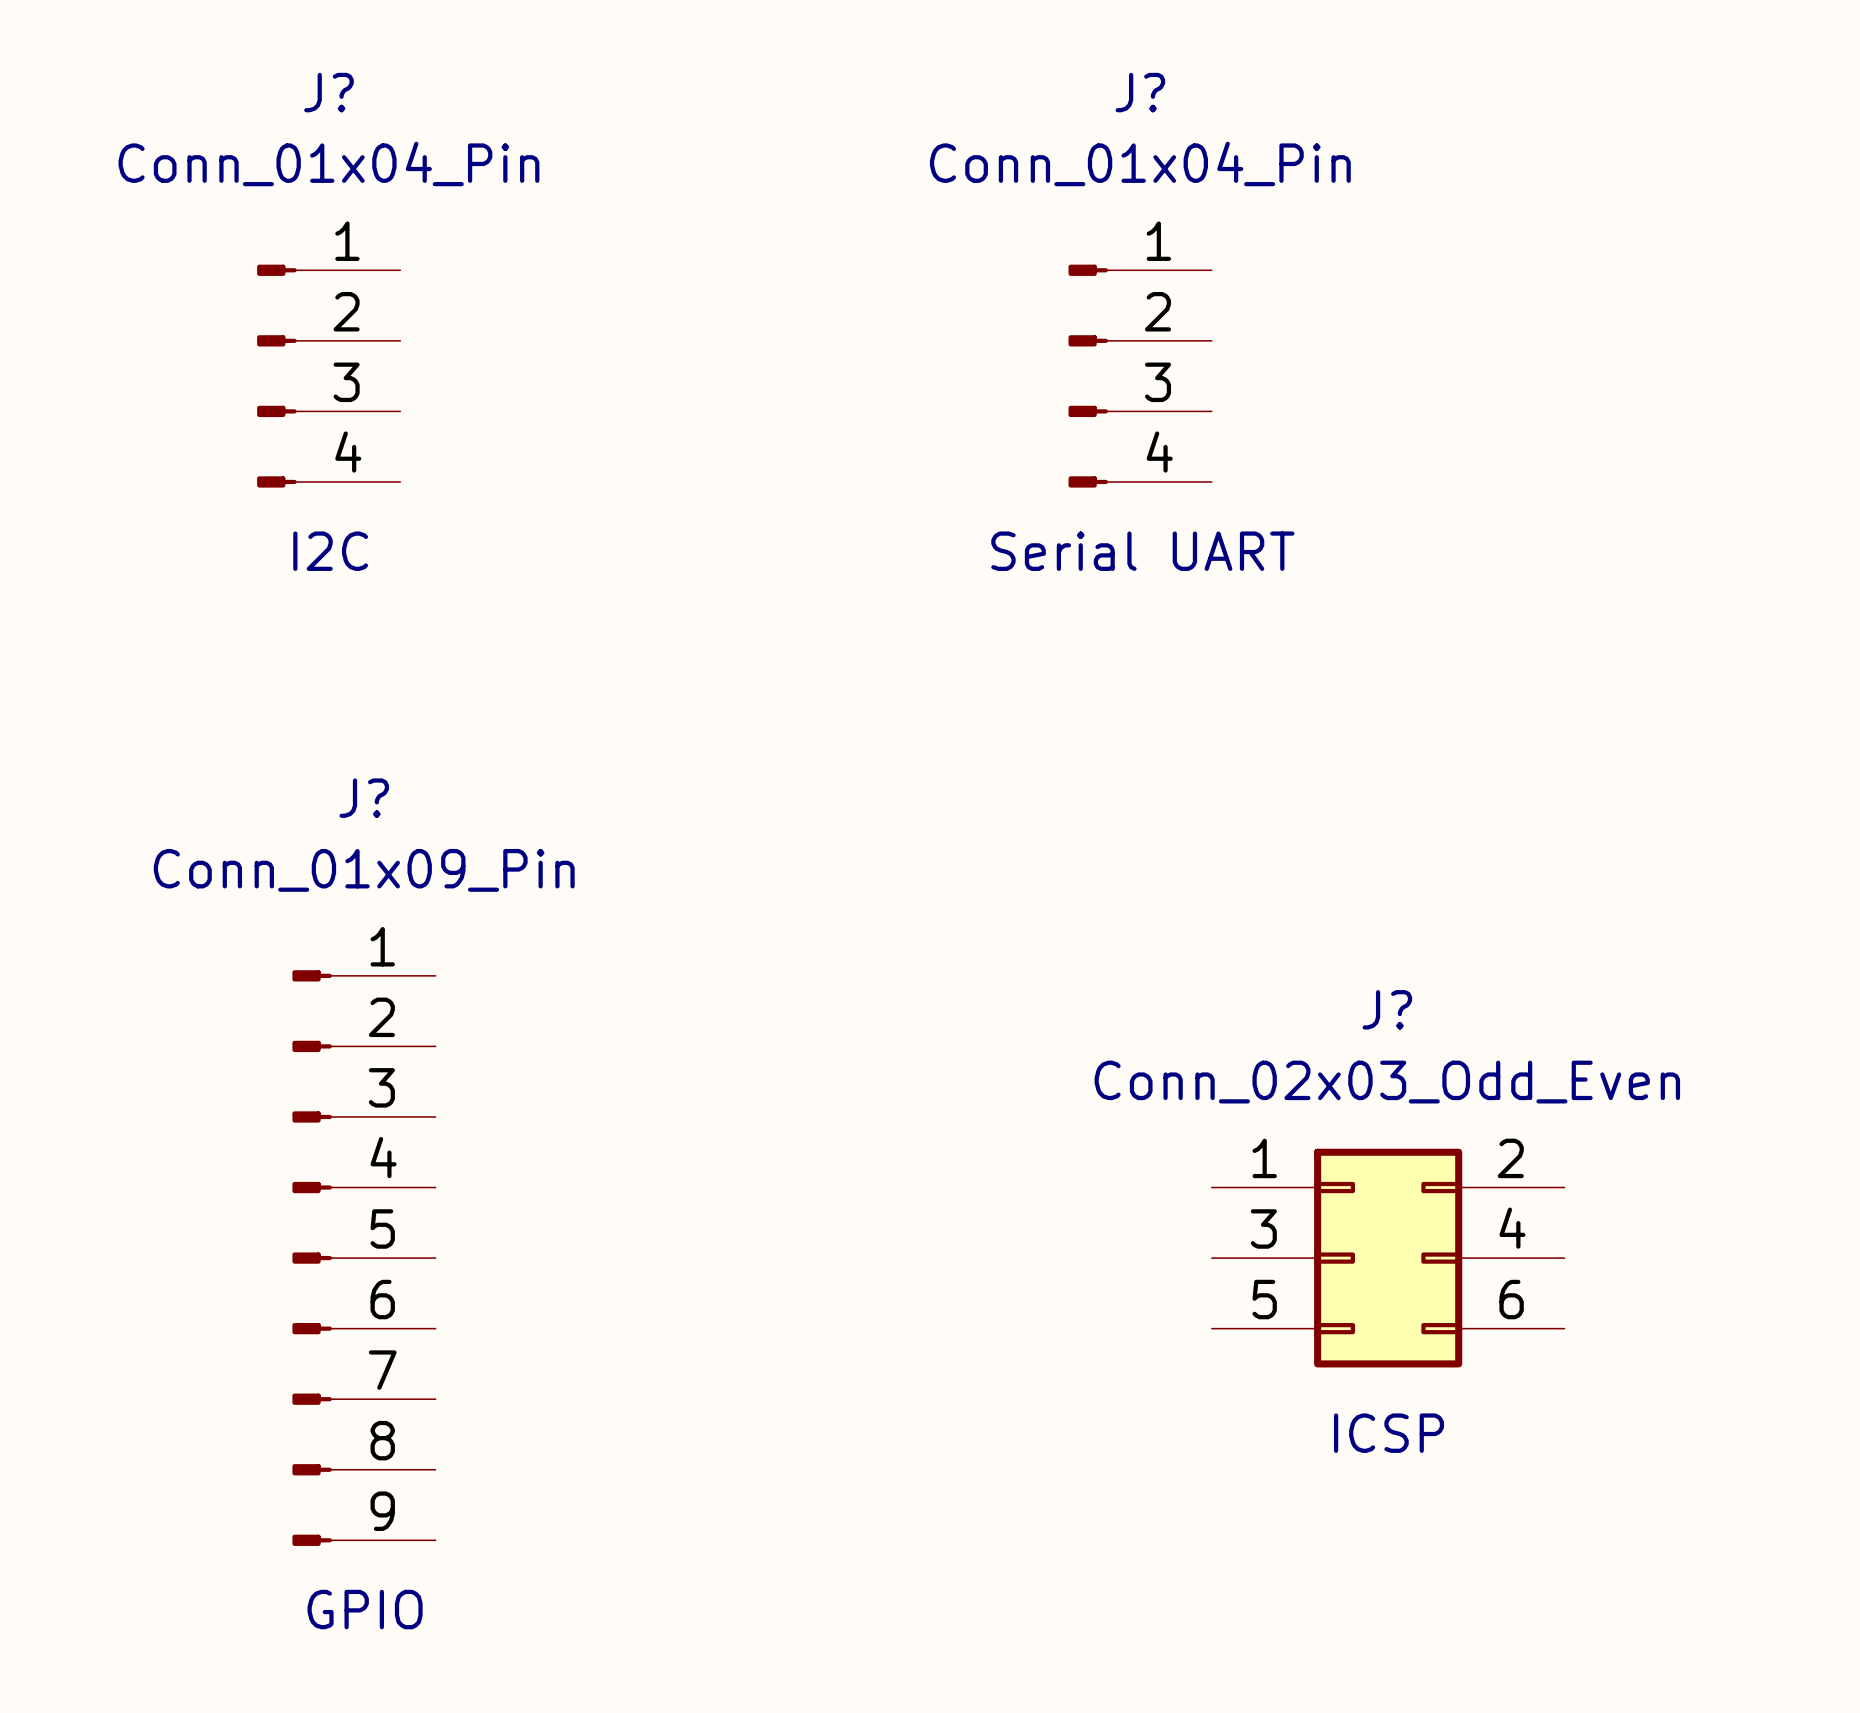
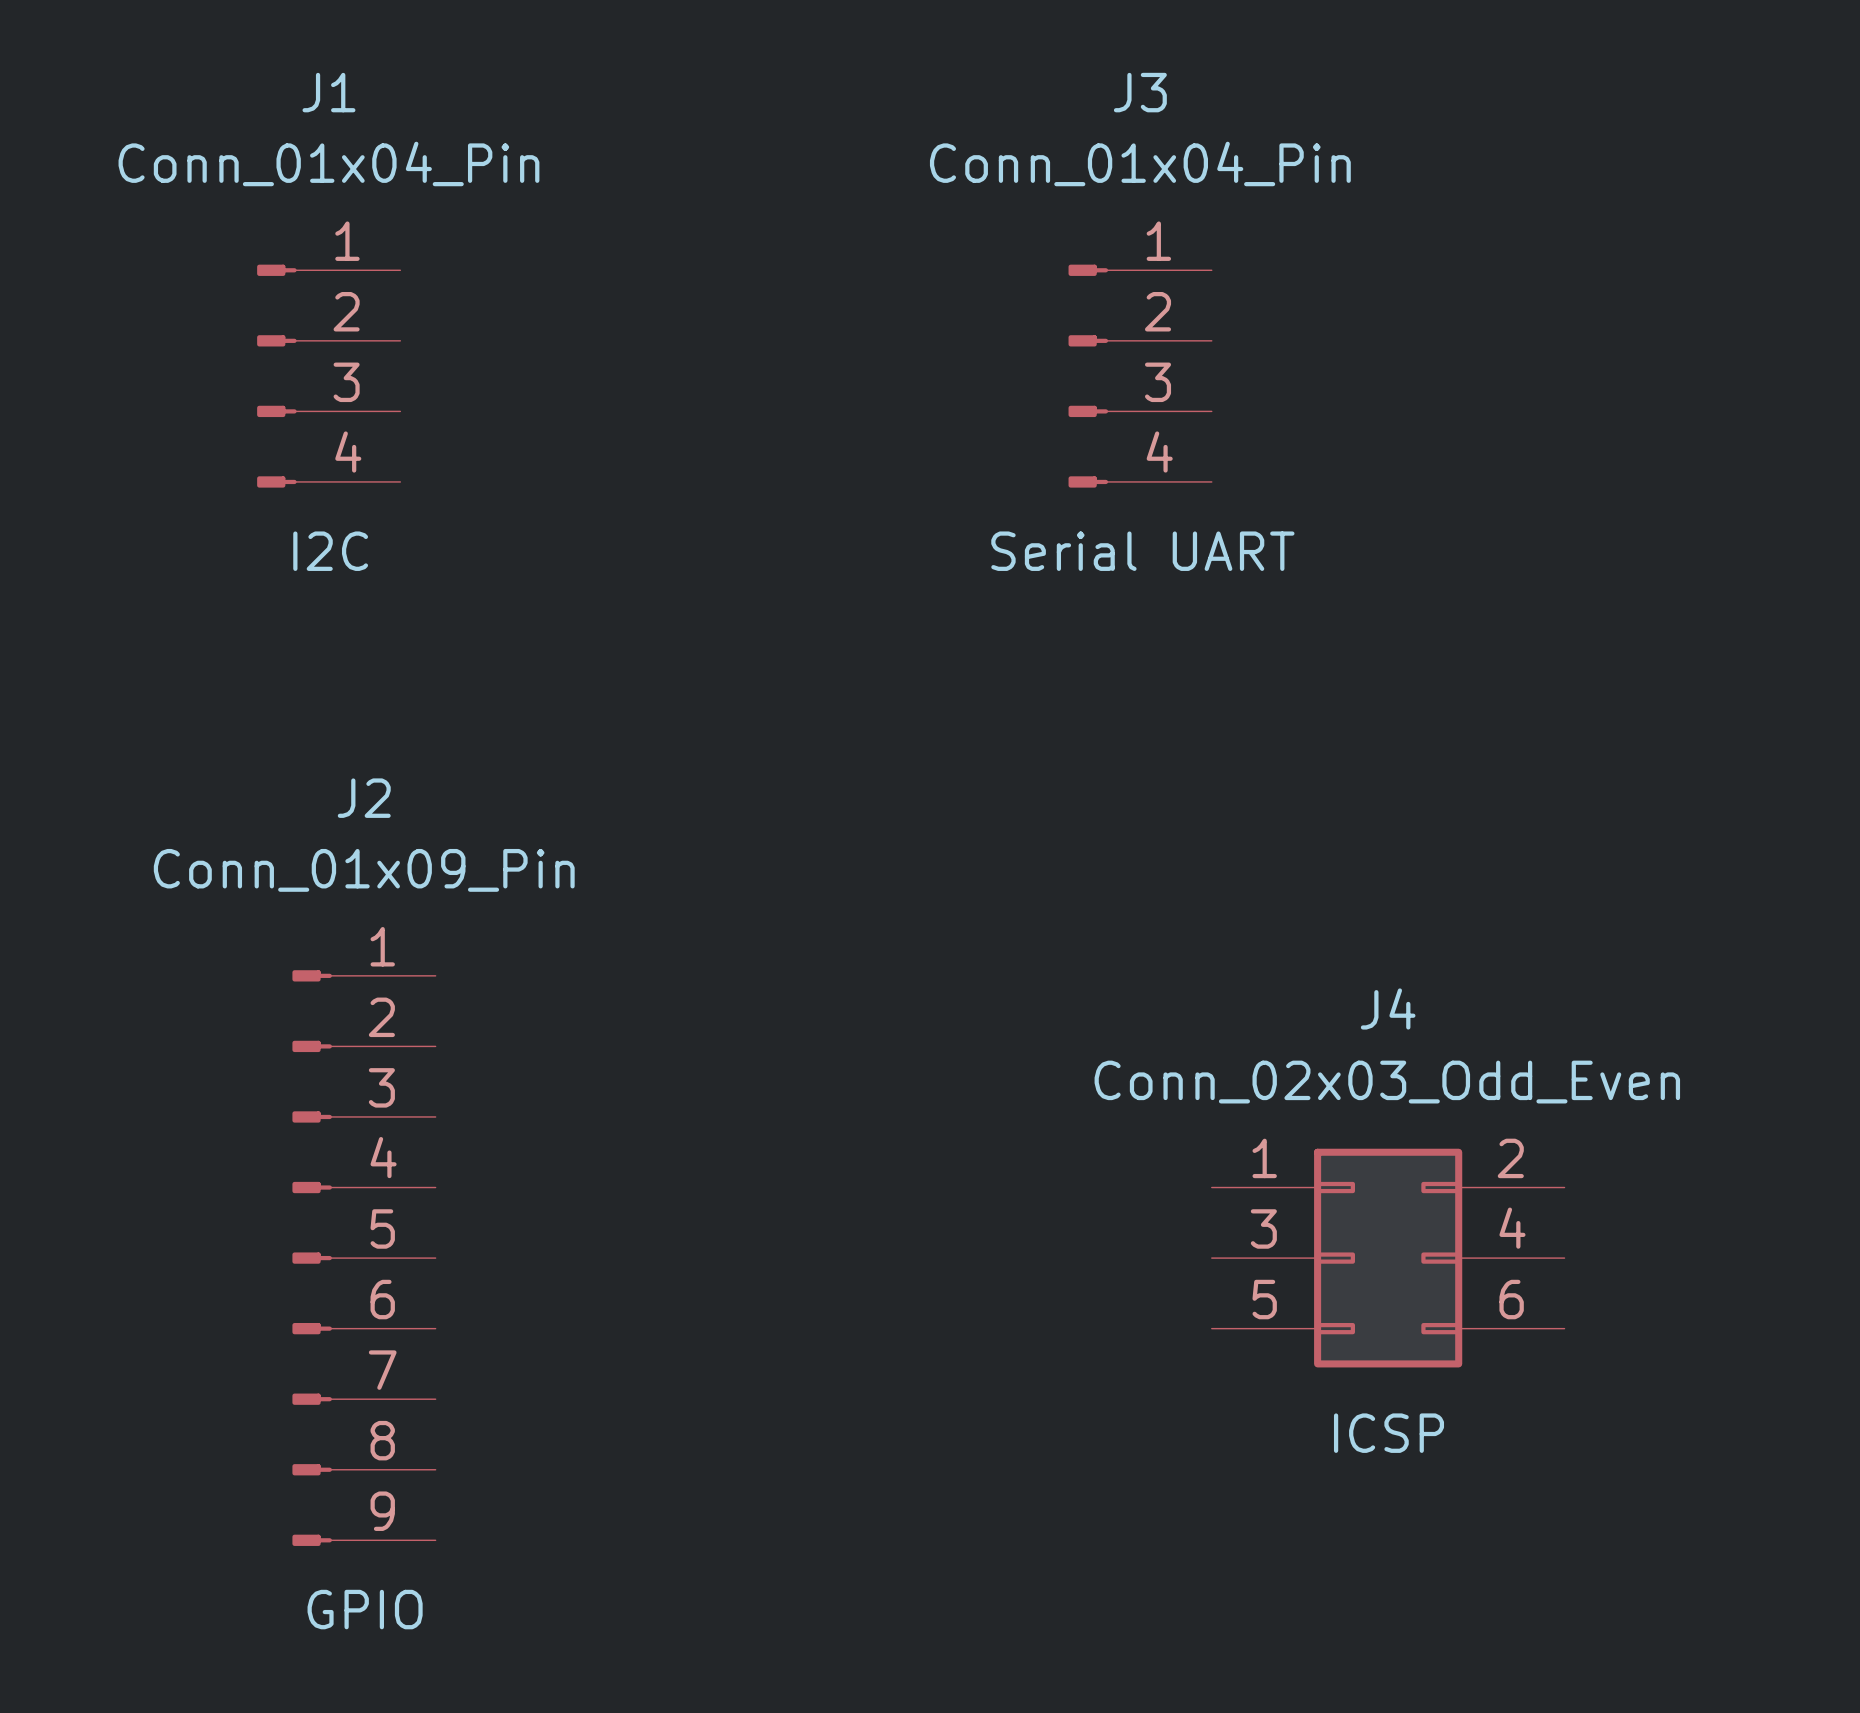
J? name: J? (328, 92) -> J1 (328, 92)
J? name: J? (1140, 92) -> J3 (1140, 92)
J? name: J? (364, 798) -> J2 (364, 798)
J? name: J? (1387, 1009) -> J4 (1388, 1008)

